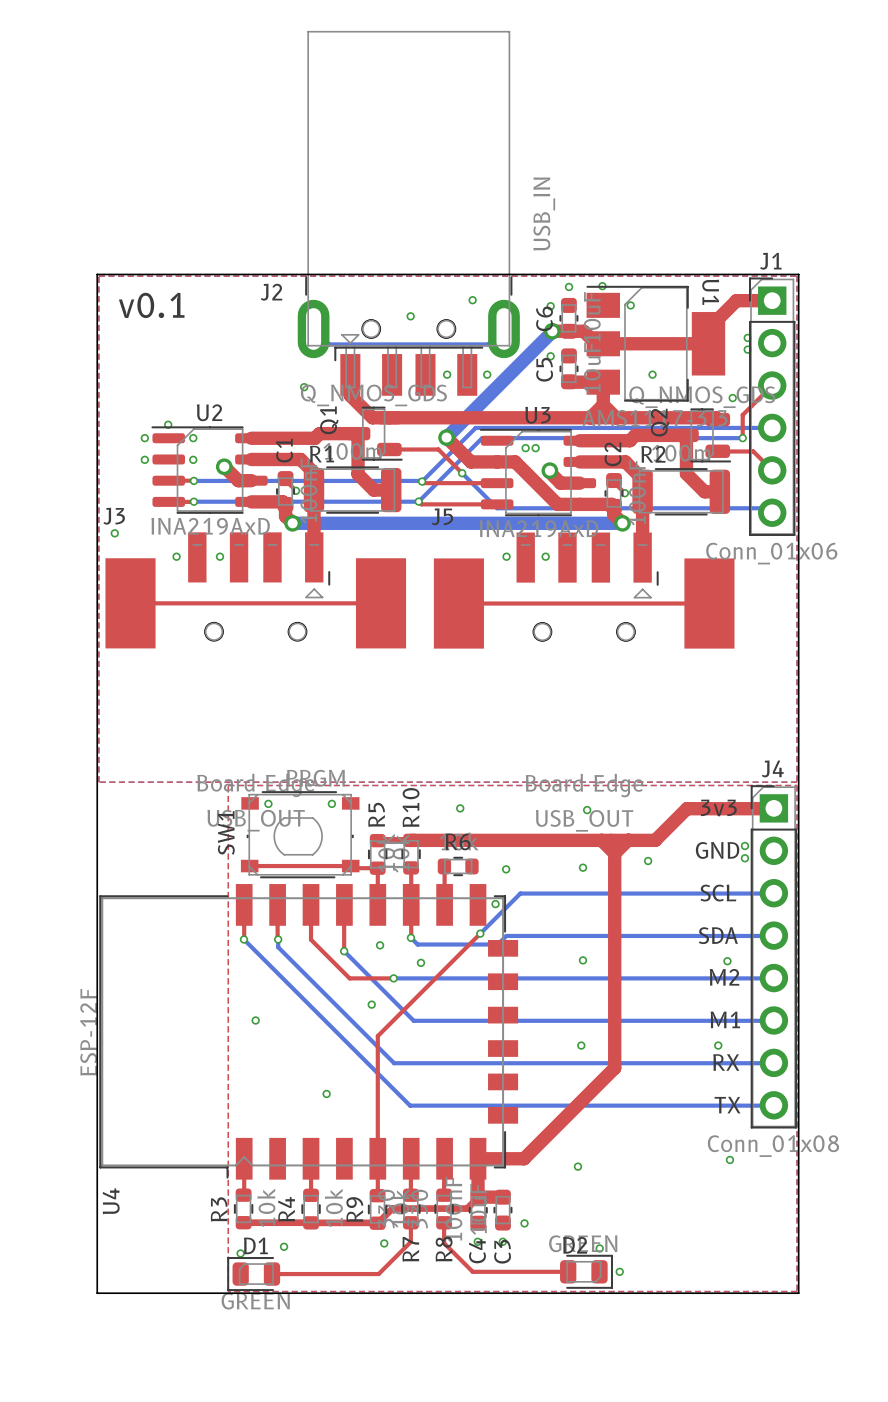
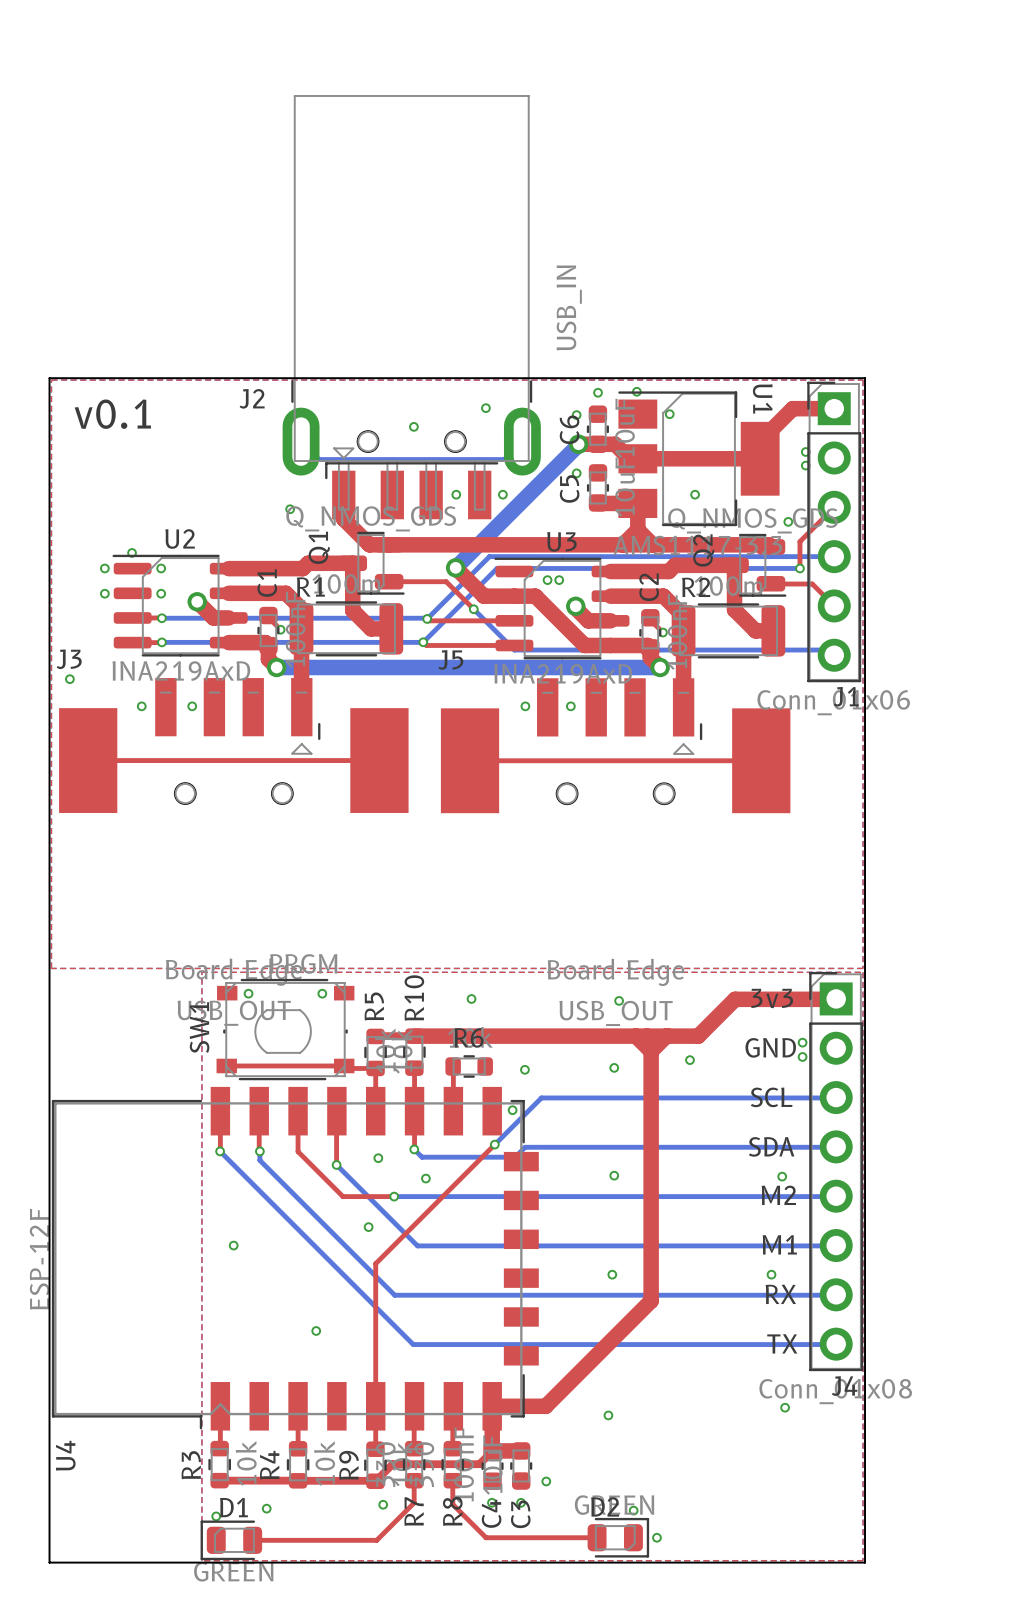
J1 name position: J1 (770, 261) -> J1 (846, 696)
J4 name position: J4 (772, 768) -> J4 (844, 1386)

